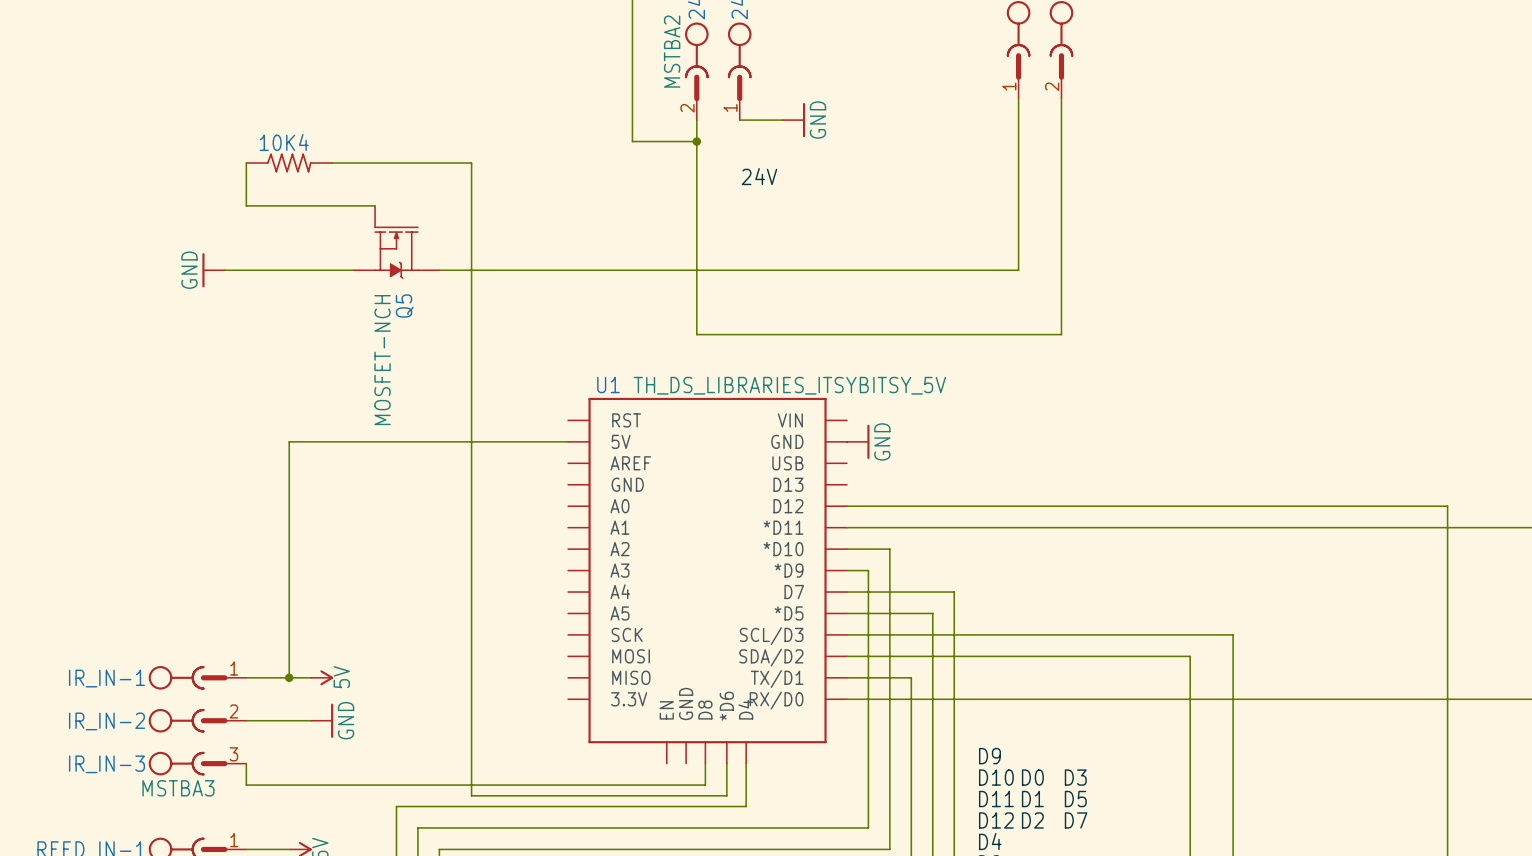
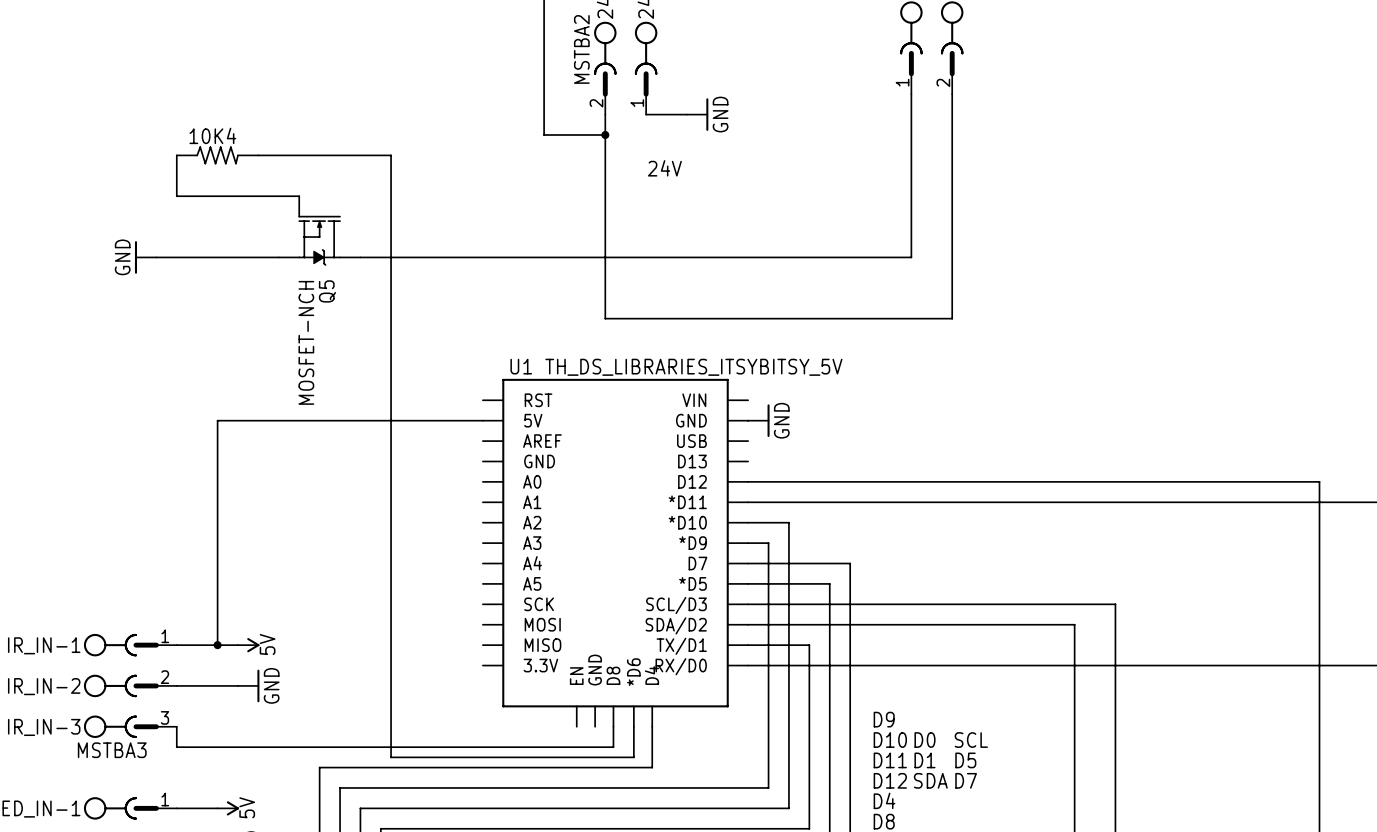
label: D3 (1075, 777) -> SCL (971, 740)
label: D2 (1032, 820) -> SDA (930, 780)

